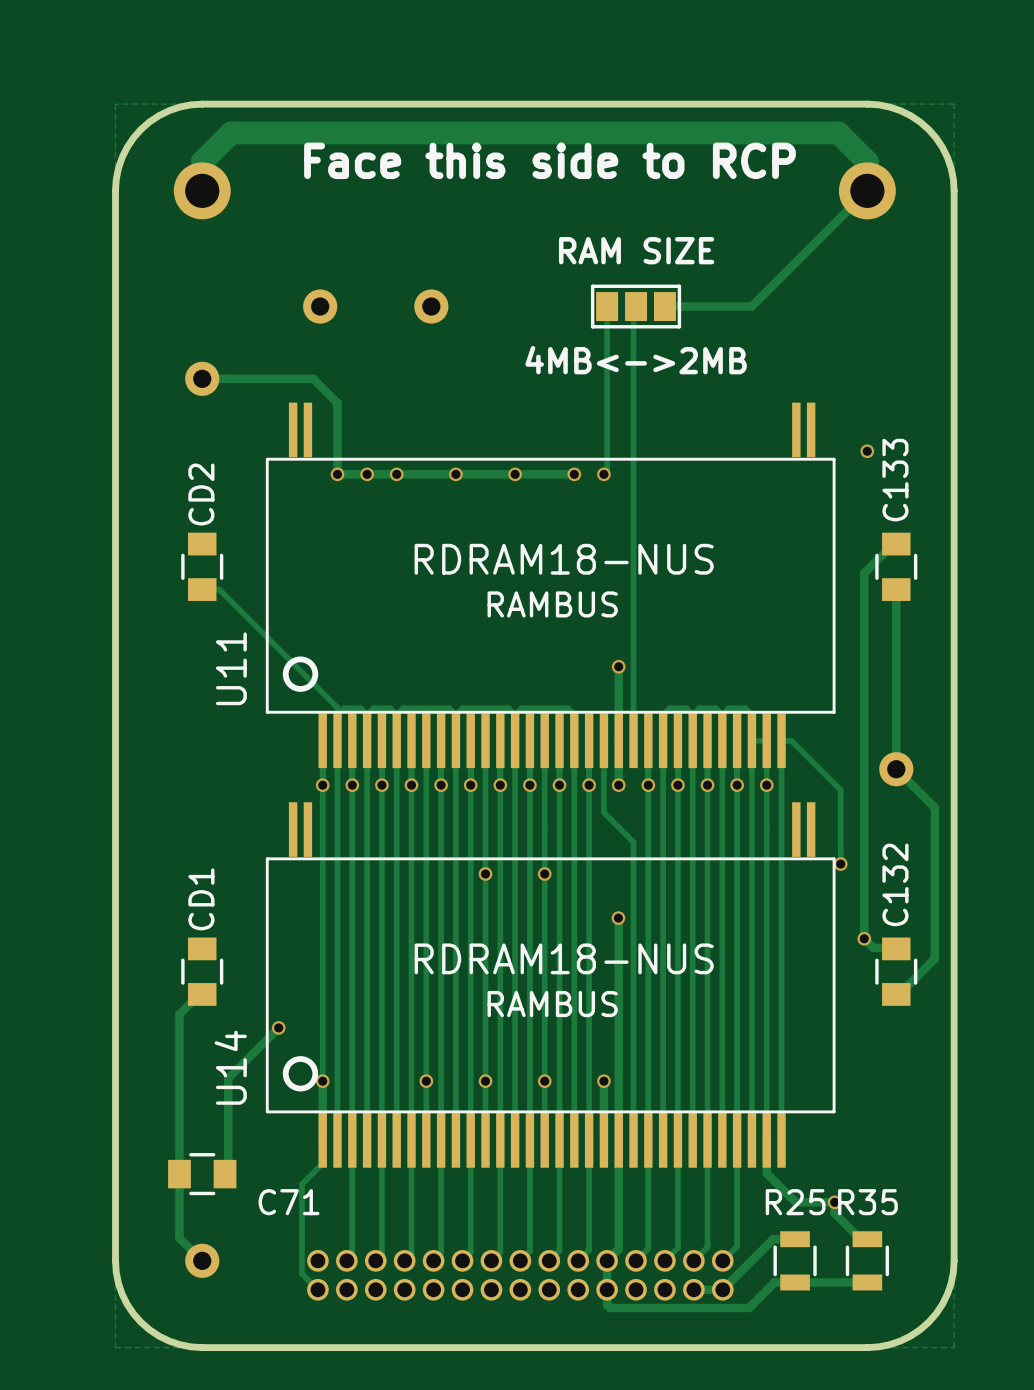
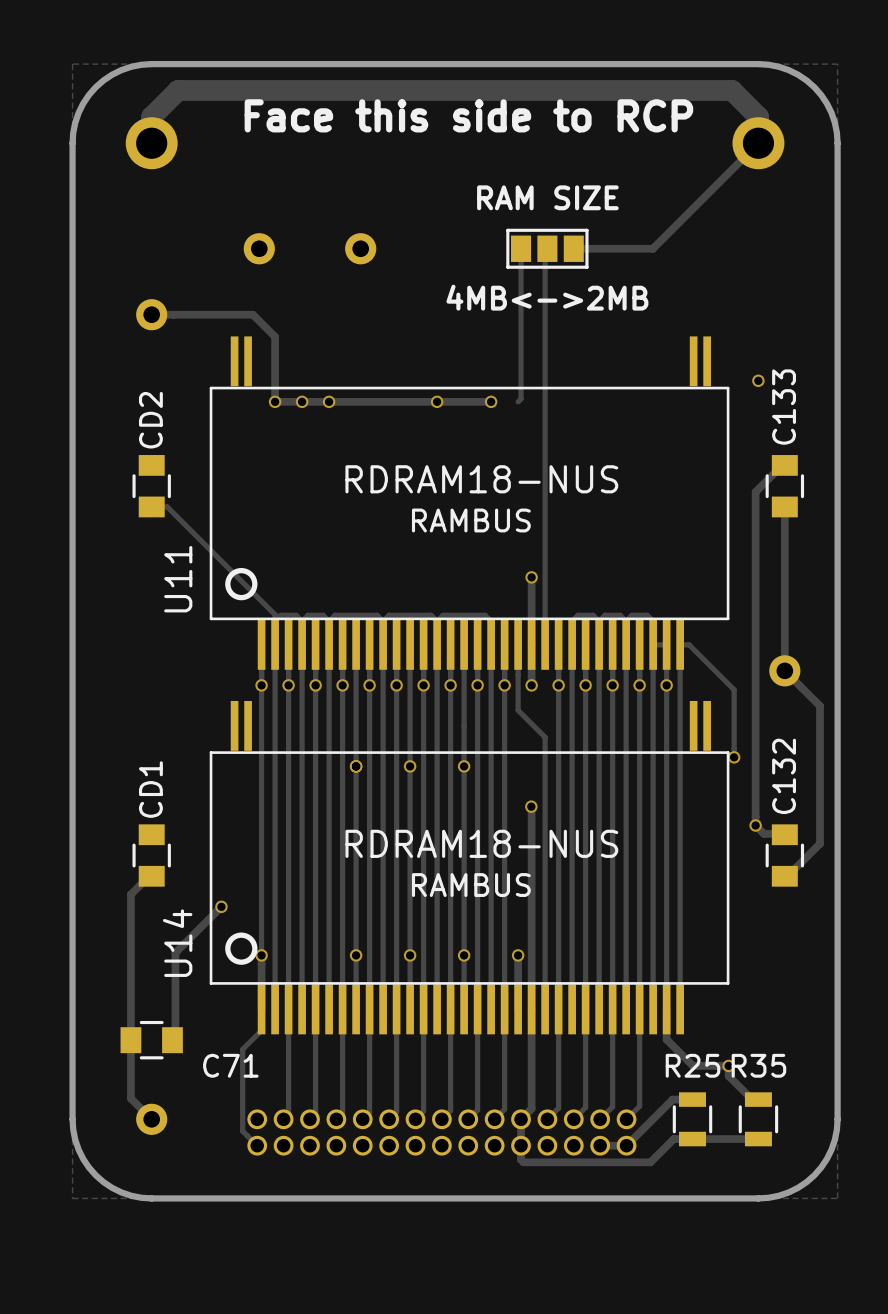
via: (455, 474) -> none
via: (603, 474) -> none
via: none -> (356, 766)

